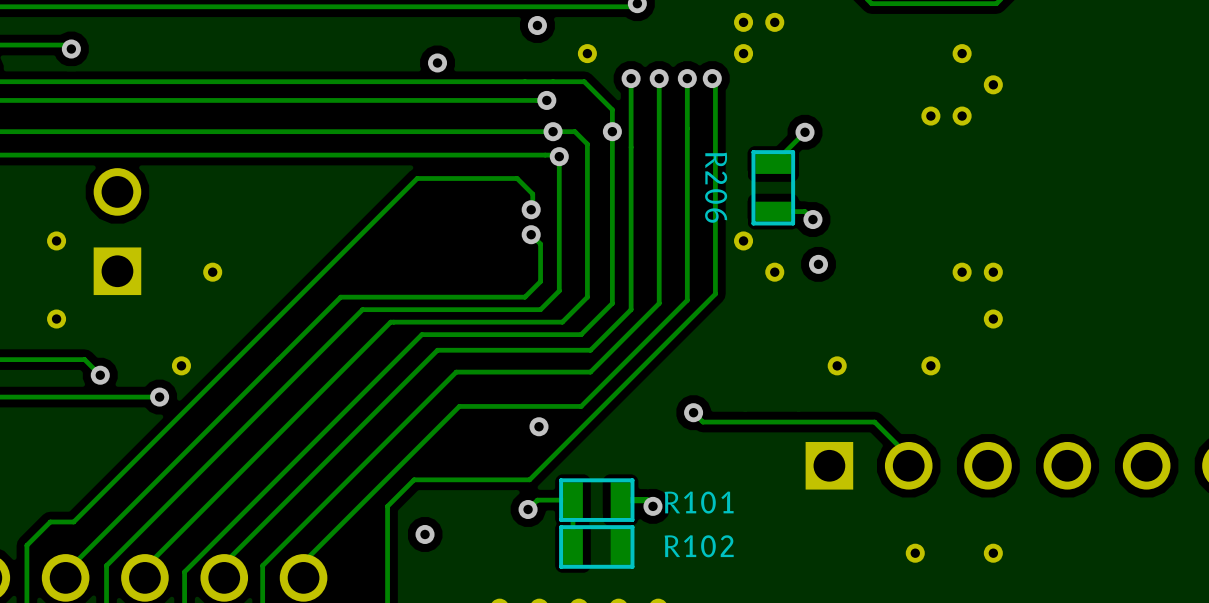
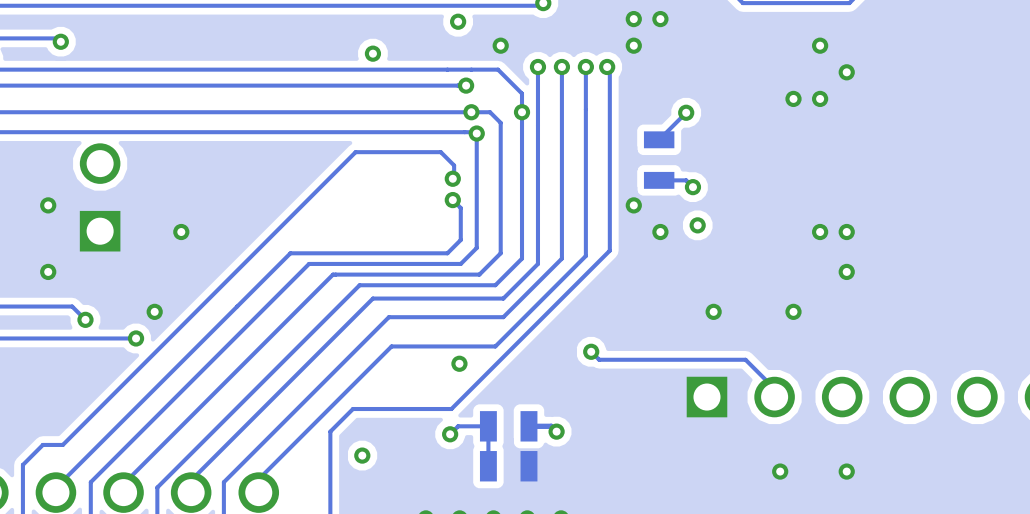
R206: (773, 187) -> none
part: none -> (659, 160)
R101: (596, 500) -> none
part: none -> (508, 426)
R102: (596, 546) -> none
part: none -> (508, 466)

